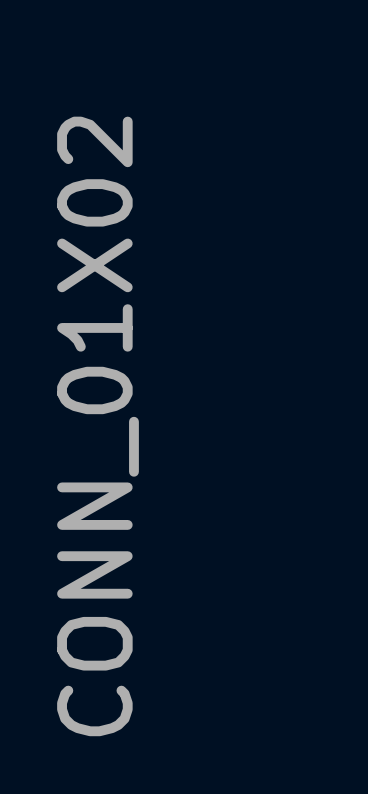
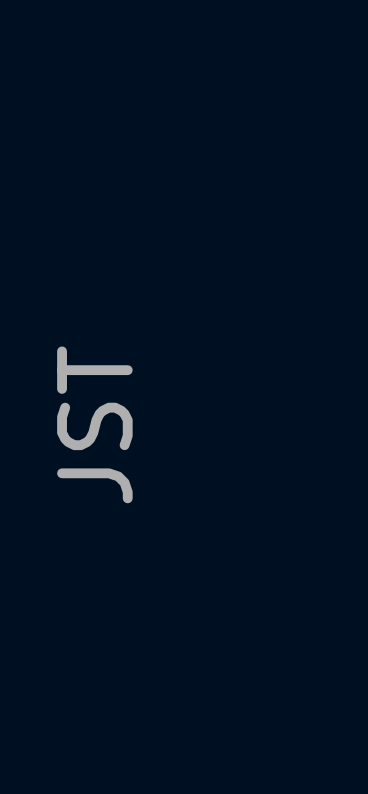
part value: CONN_01X02 (98, 426) -> JST (94, 424)

